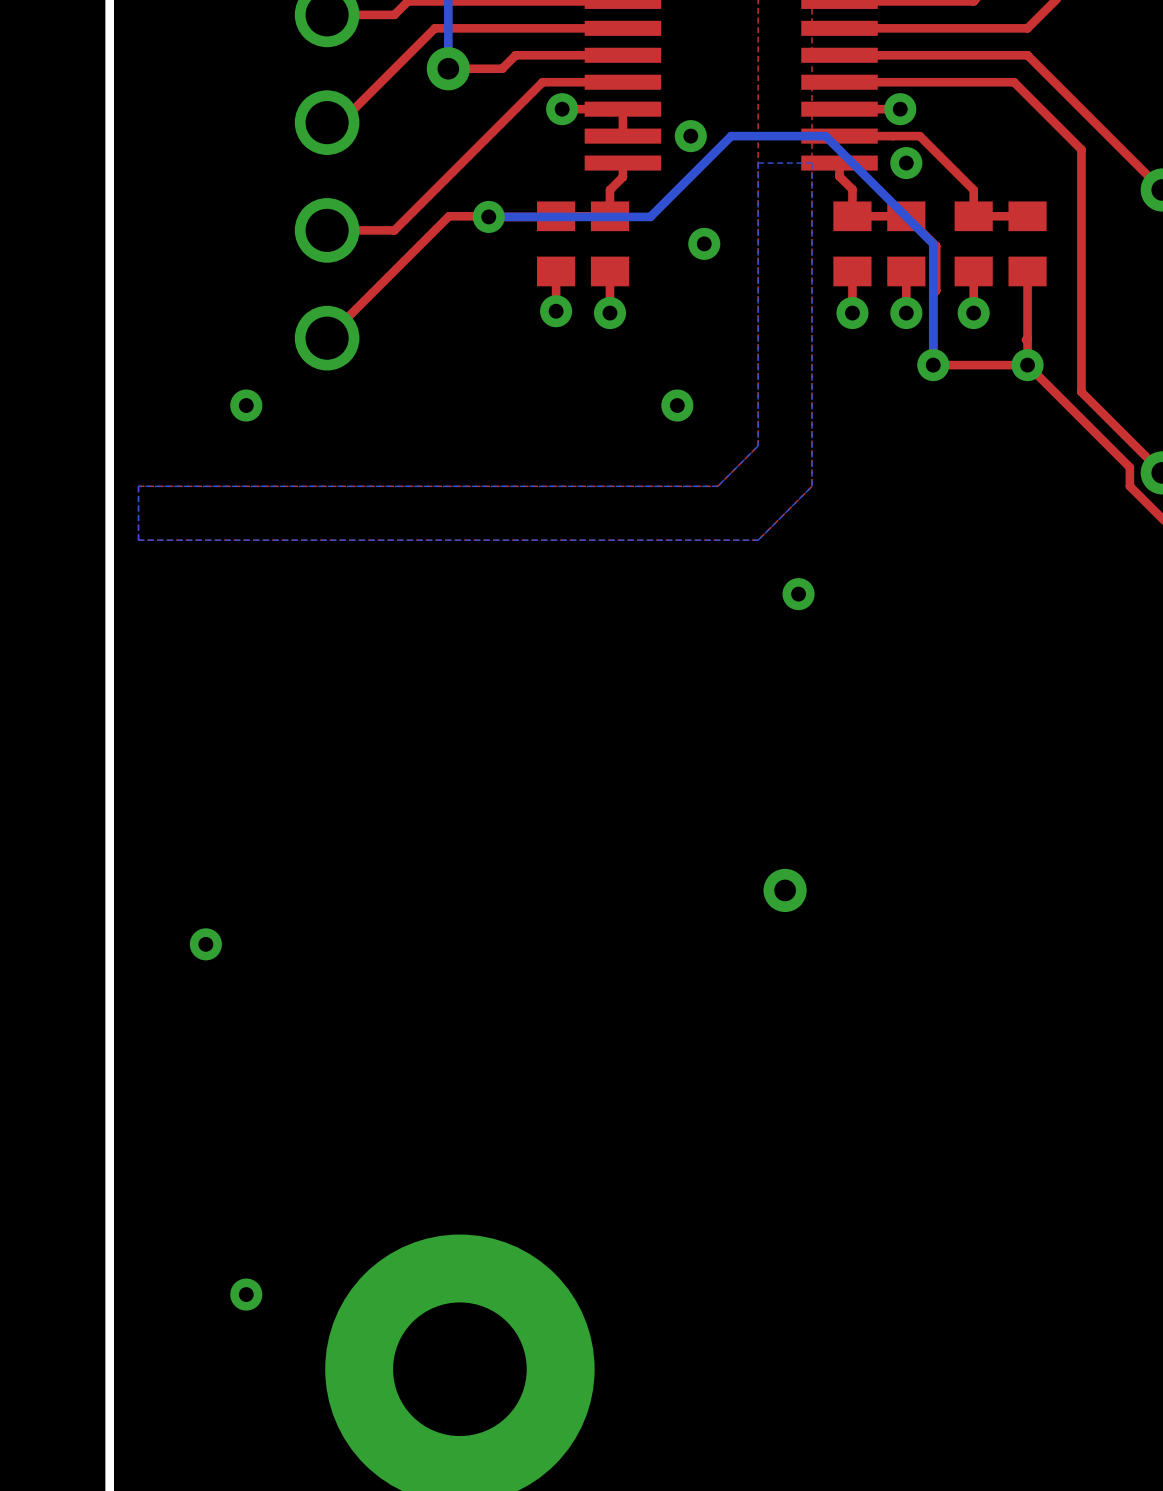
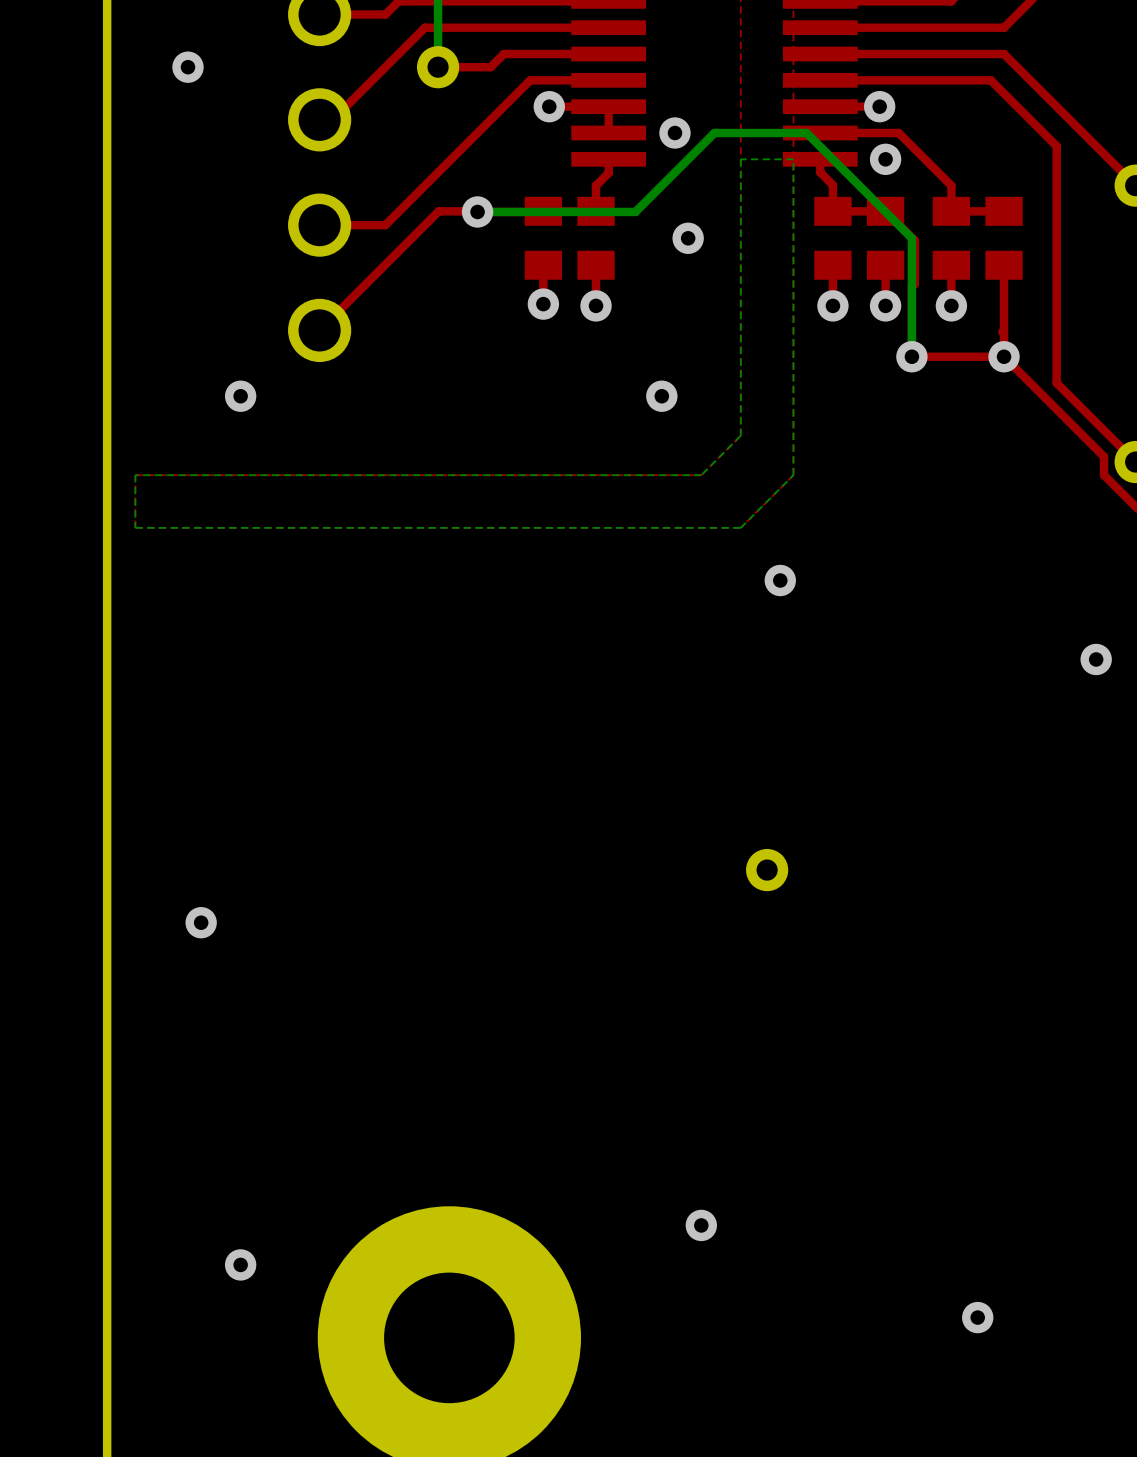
via: none -> (188, 67)
via: none -> (1096, 659)
via: none -> (701, 1225)
via: none -> (977, 1317)

